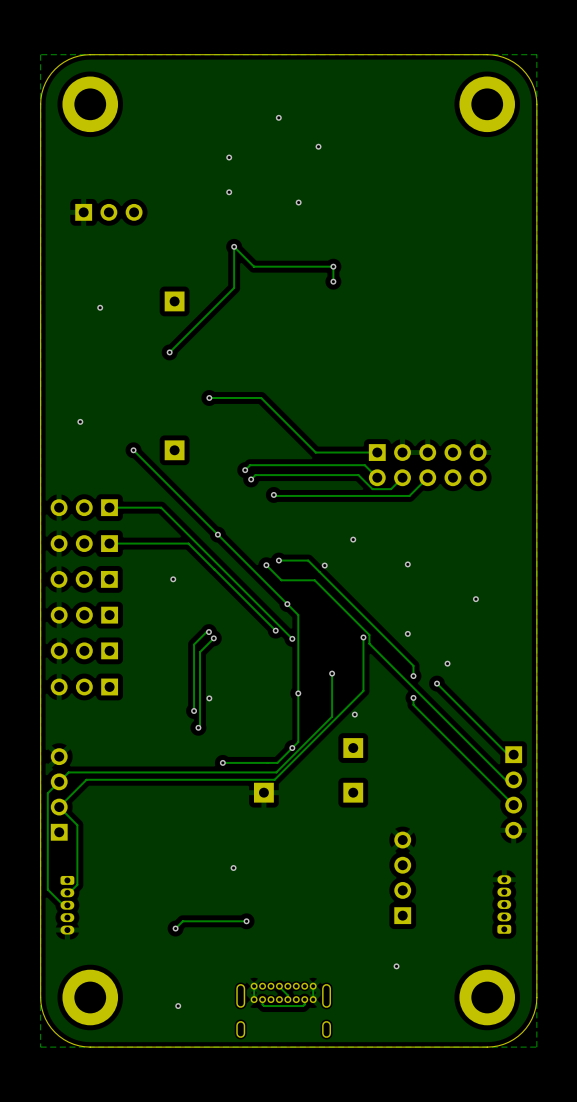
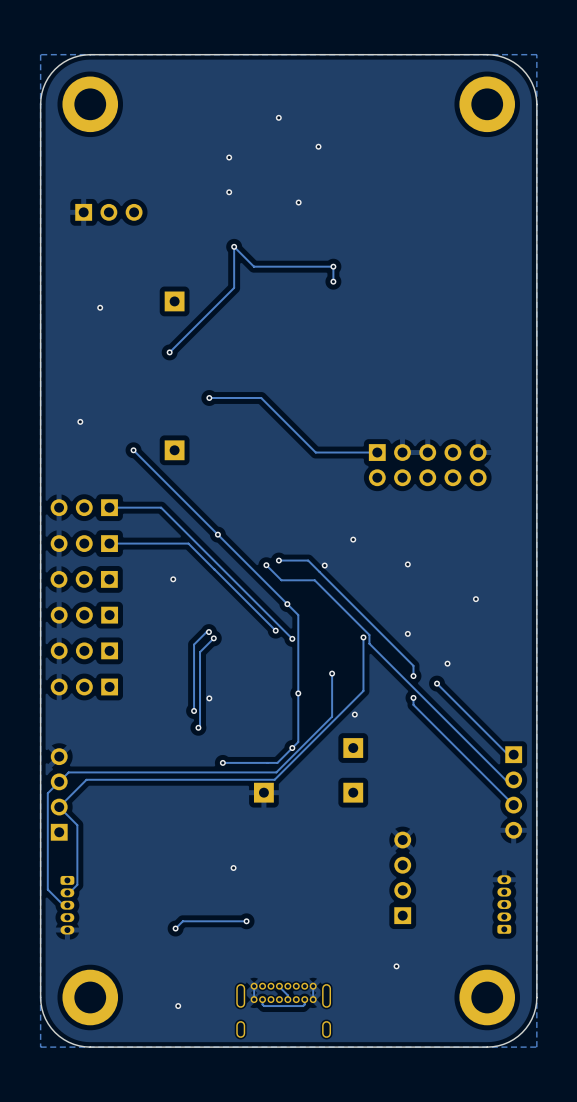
track: (245, 470) (250, 465) (364, 465) (377, 477) -> none
via: (245, 470) -> none
track: (402, 477) (391, 489) (372, 489) (358, 475) (255, 475) (251, 479) -> none
track: (427, 477) (409, 495) (273, 494) -> none
via: (251, 479) -> none
via: (273, 494) -> none

